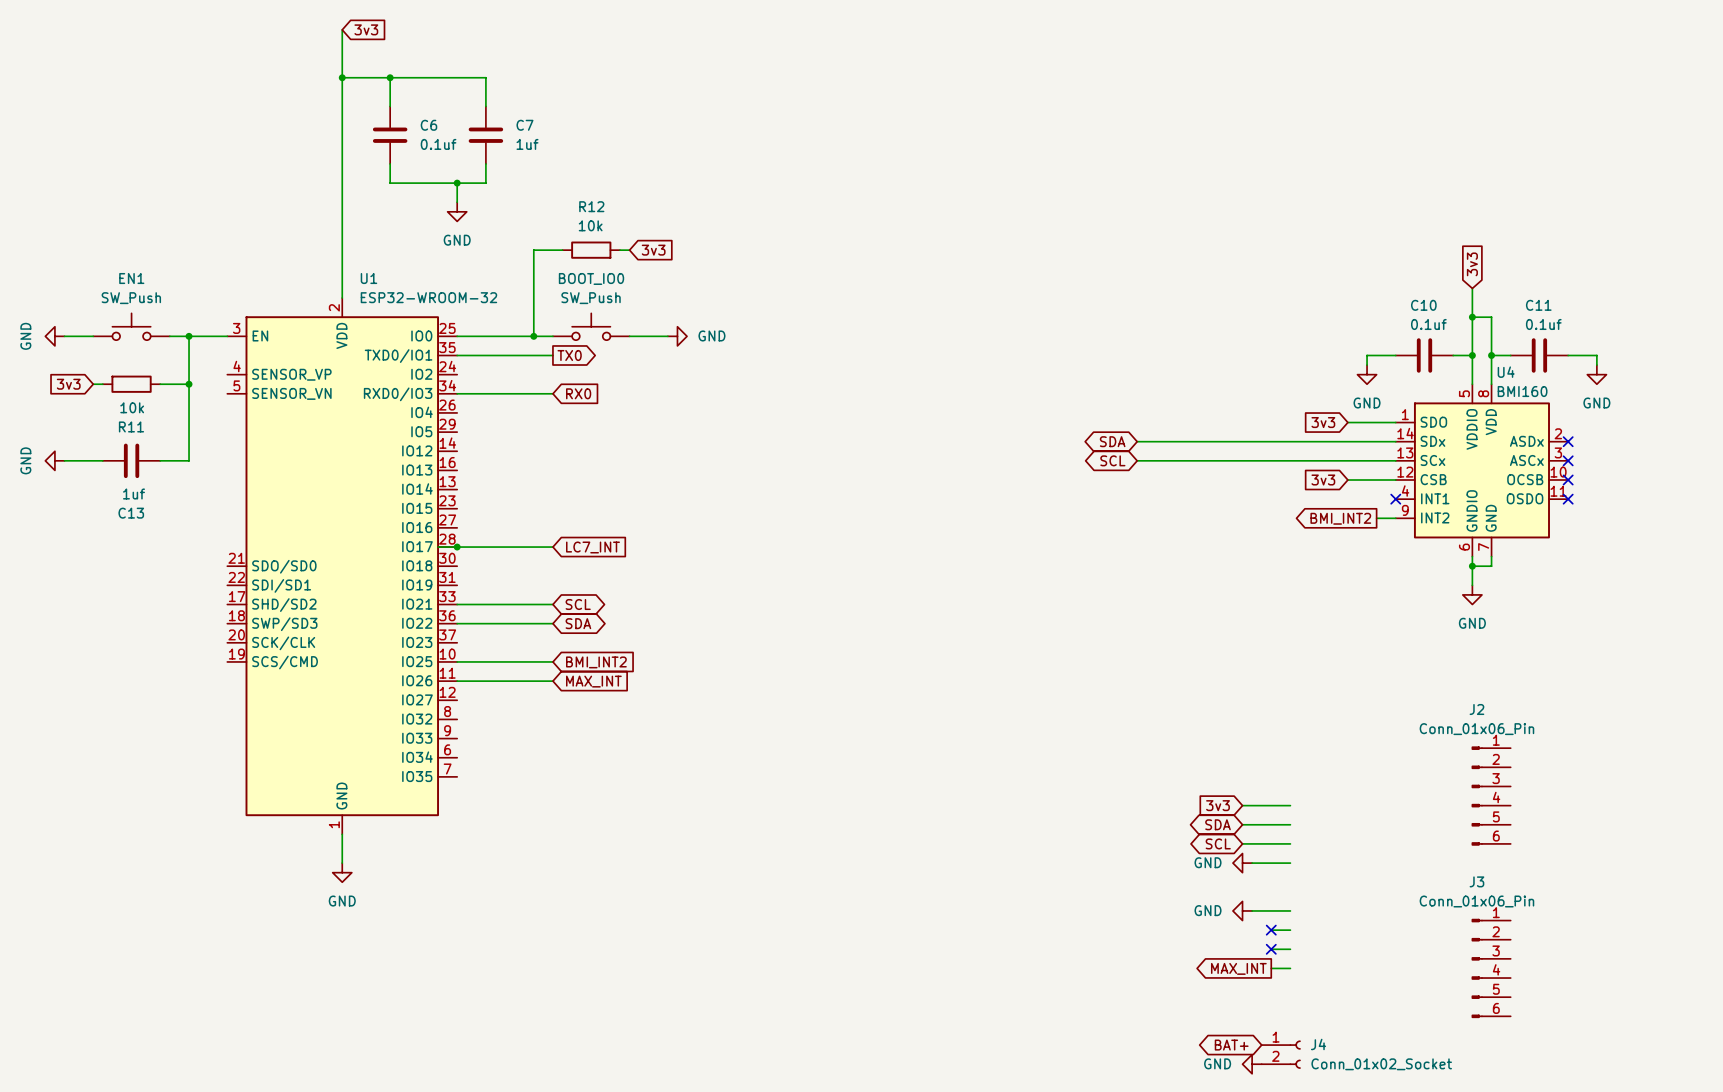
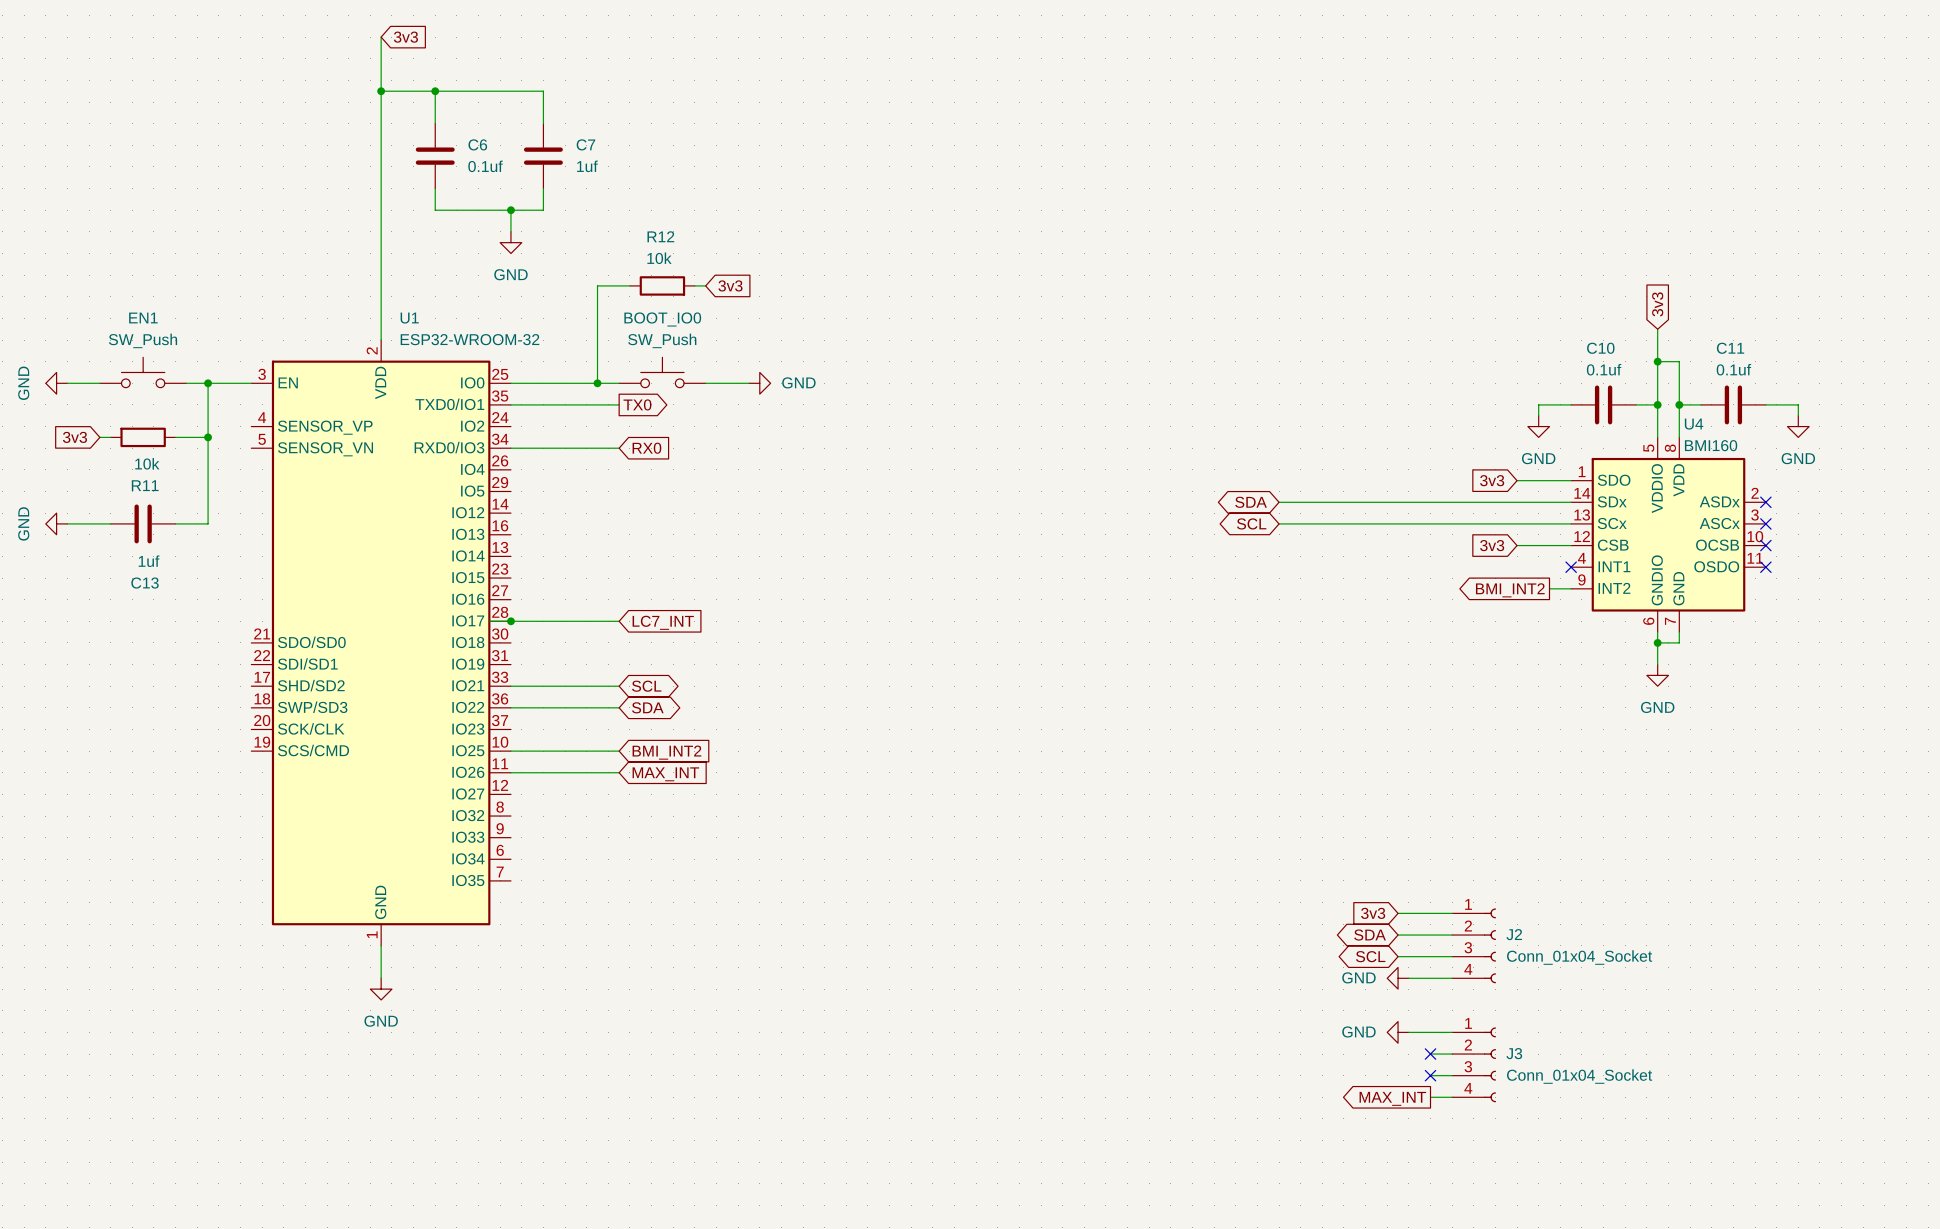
J2 name position: J2 (1476, 709) -> J2 (1514, 934)
J2 value: Conn_01x06_Pin (1476, 729) -> Conn_01x04_Socket (1579, 957)
J2 symbol: [1471, 746, 1511, 846] -> [1452, 908, 1497, 984]
J3 name position: J3 (1476, 881) -> J3 (1514, 1053)
J3 value: Conn_01x06_Pin (1476, 901) -> Conn_01x04_Socket (1579, 1076)
J3 symbol: [1471, 919, 1511, 1018] -> [1452, 1027, 1497, 1103]
global label: BAT+ (1231, 1045) -> none
J4: Conn_01x02_Socket (1281, 1054) -> none
power symbol: GND (1252, 1064) -> none

